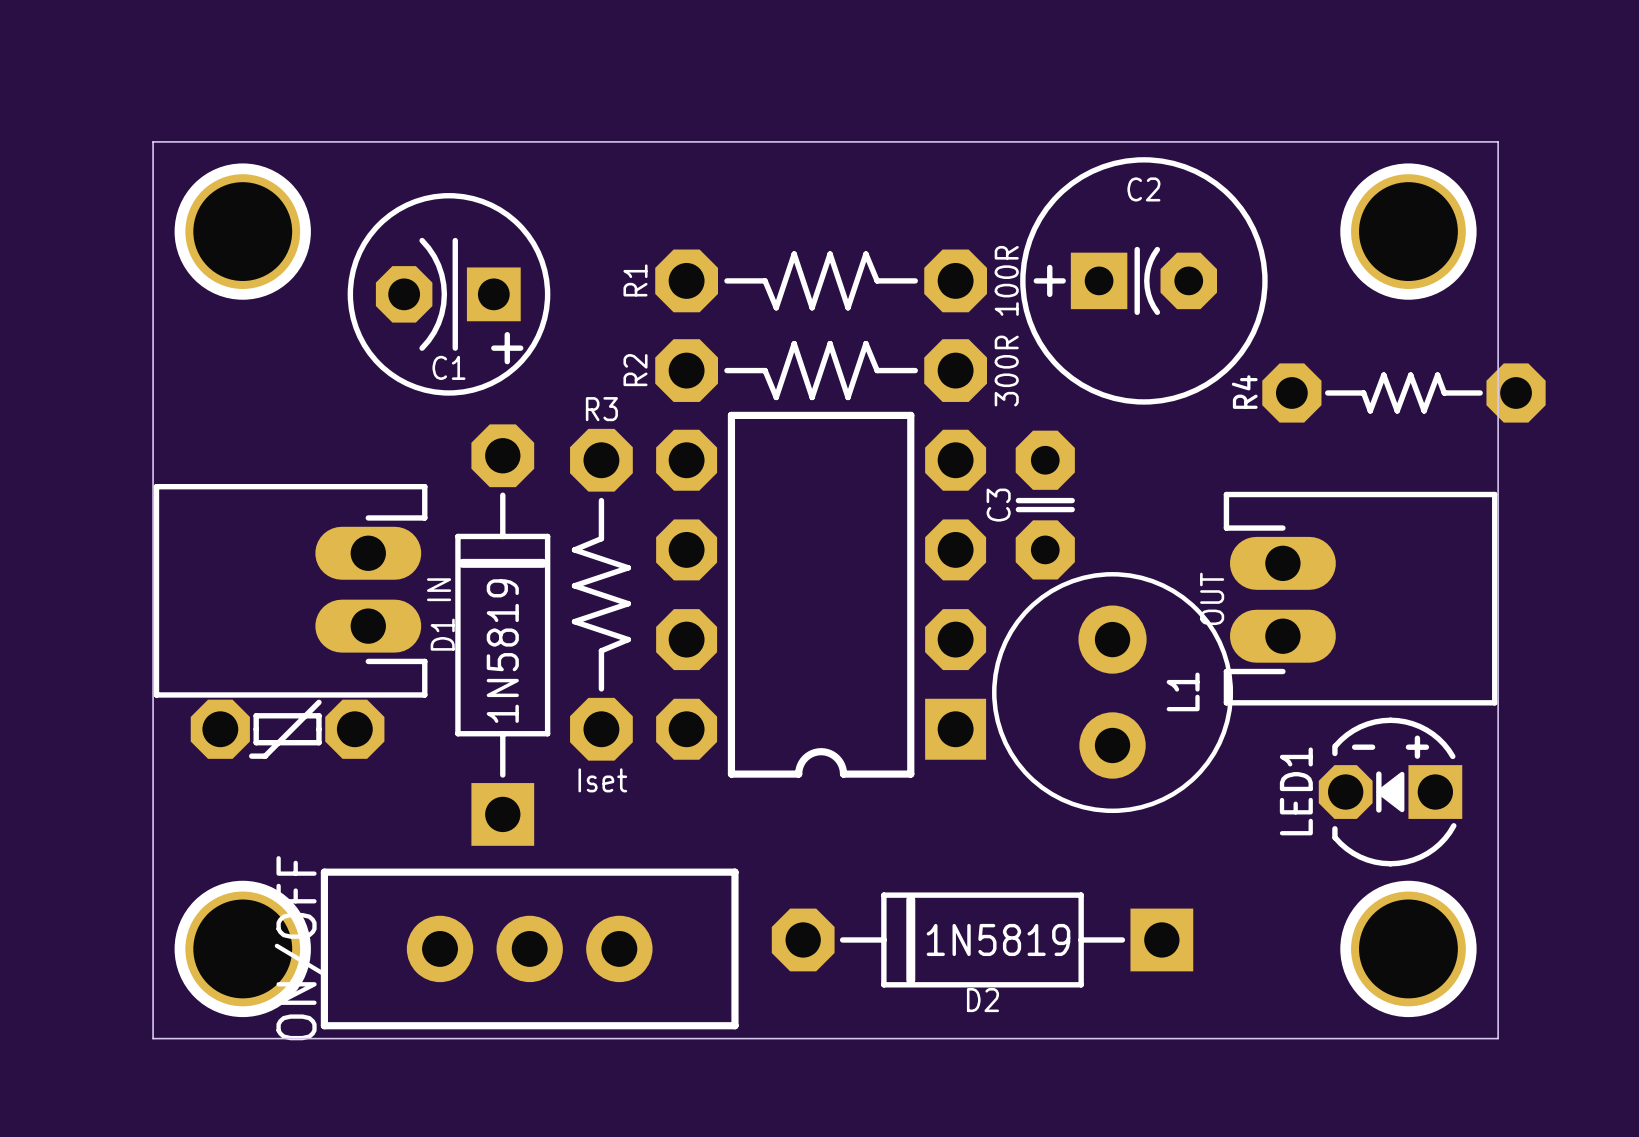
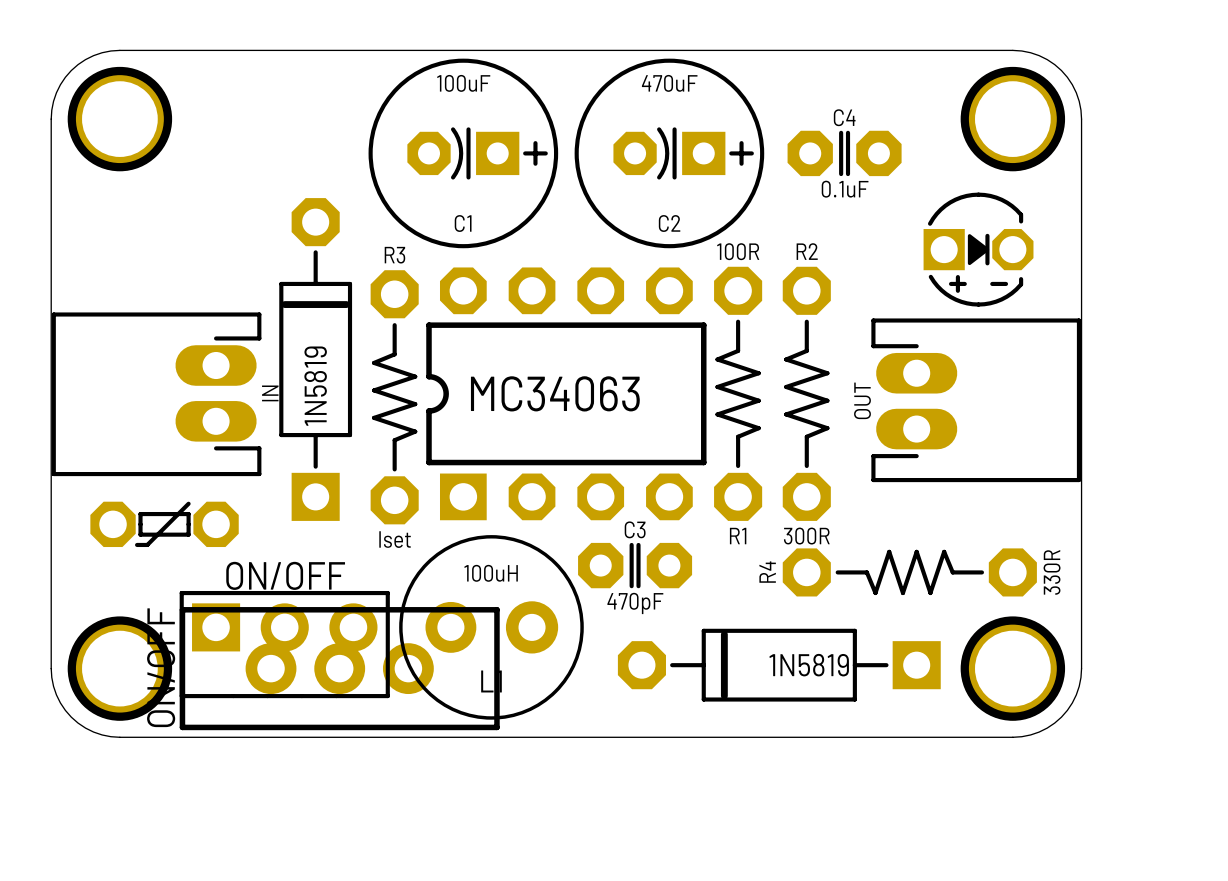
board edge: (242, 141) (153, 141) (153, 231) -> (119, 50) (93, 55) (71, 70) (56, 92) (51, 119)
board edge: (1408, 141) (1498, 141) (1498, 231) -> (1012, 50) (1039, 55) (1061, 70) (1076, 92) (1081, 119)
C1 value: none -> 100uF (463, 83)
C2 value: none -> 470uF (669, 83)
C1 footprint: [347, 193, 551, 396] -> [368, 58, 559, 249]
C4: none -> 0.1uF (844, 153)
R1 name position: R1 (635, 280) -> R1 (738, 536)
R1 rotation: 0° (821, 280) -> 90° clockwise (738, 393)
R1 position: (821, 280) -> (738, 393)
R1 value position: 100R (1006, 280) -> 100R (738, 251)
C2 rotation: 0° (1143, 280) -> 180° (669, 153)
C2 position: (1143, 280) -> (669, 153)
R4 footprint: [1262, 363, 1546, 423] -> [782, 548, 1037, 597]
R2 rotation: 0° (821, 370) -> 90° clockwise (806, 393)
R2 position: (821, 370) -> (806, 393)
part: none -> (978, 249)
C3 rotation: 0° (1045, 505) -> 90° clockwise (635, 565)
C3 position: (1045, 505) -> (635, 565)
part: none -> 1N5819 (315, 359)
part value: none -> MC34063 (555, 393)
part rotation: 0° (821, 594) -> 90° clockwise (566, 393)
D1: 1N5819 (502, 635) -> none
L1 rotation: 0° (1112, 692) -> 90° clockwise (491, 627)
L1 position: (1112, 692) -> (491, 627)
part position: (287, 729) -> (164, 524)
LED1: (1390, 792) -> none
R4 value: none -> 330R (1052, 572)
L1 value: none -> 100uH (491, 573)
C3 value: none -> 470pF (635, 603)
ON/OFF: none -> (284, 644)
D2: 1N5819 (982, 939) -> none
part: none -> 1N5819 (779, 665)
board edge: (153, 948) (153, 1038) (242, 1038) -> (51, 668) (56, 694) (71, 717) (93, 732) (119, 737)
board edge: (1498, 948) (1498, 1038) (1408, 1038) -> (1081, 668) (1076, 694) (1061, 717) (1039, 732) (1012, 737)

